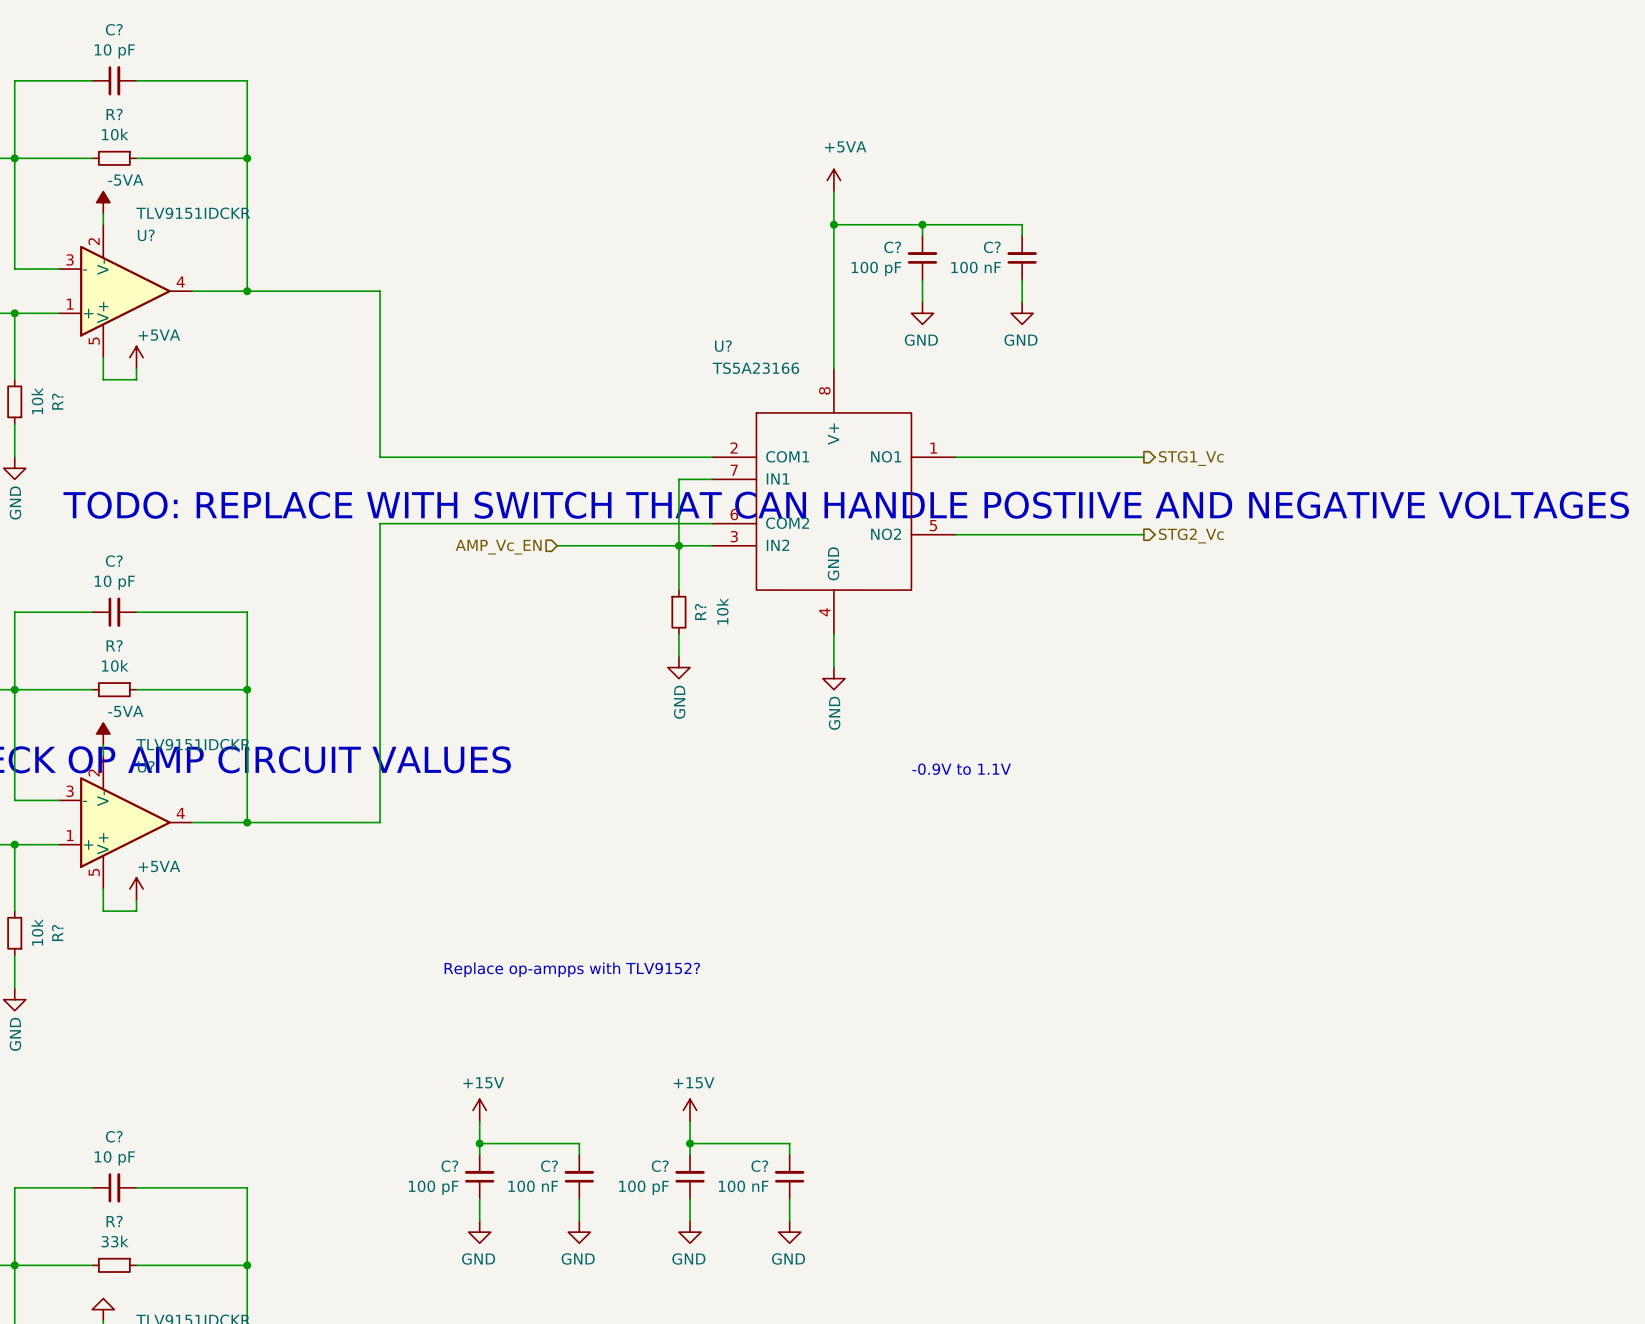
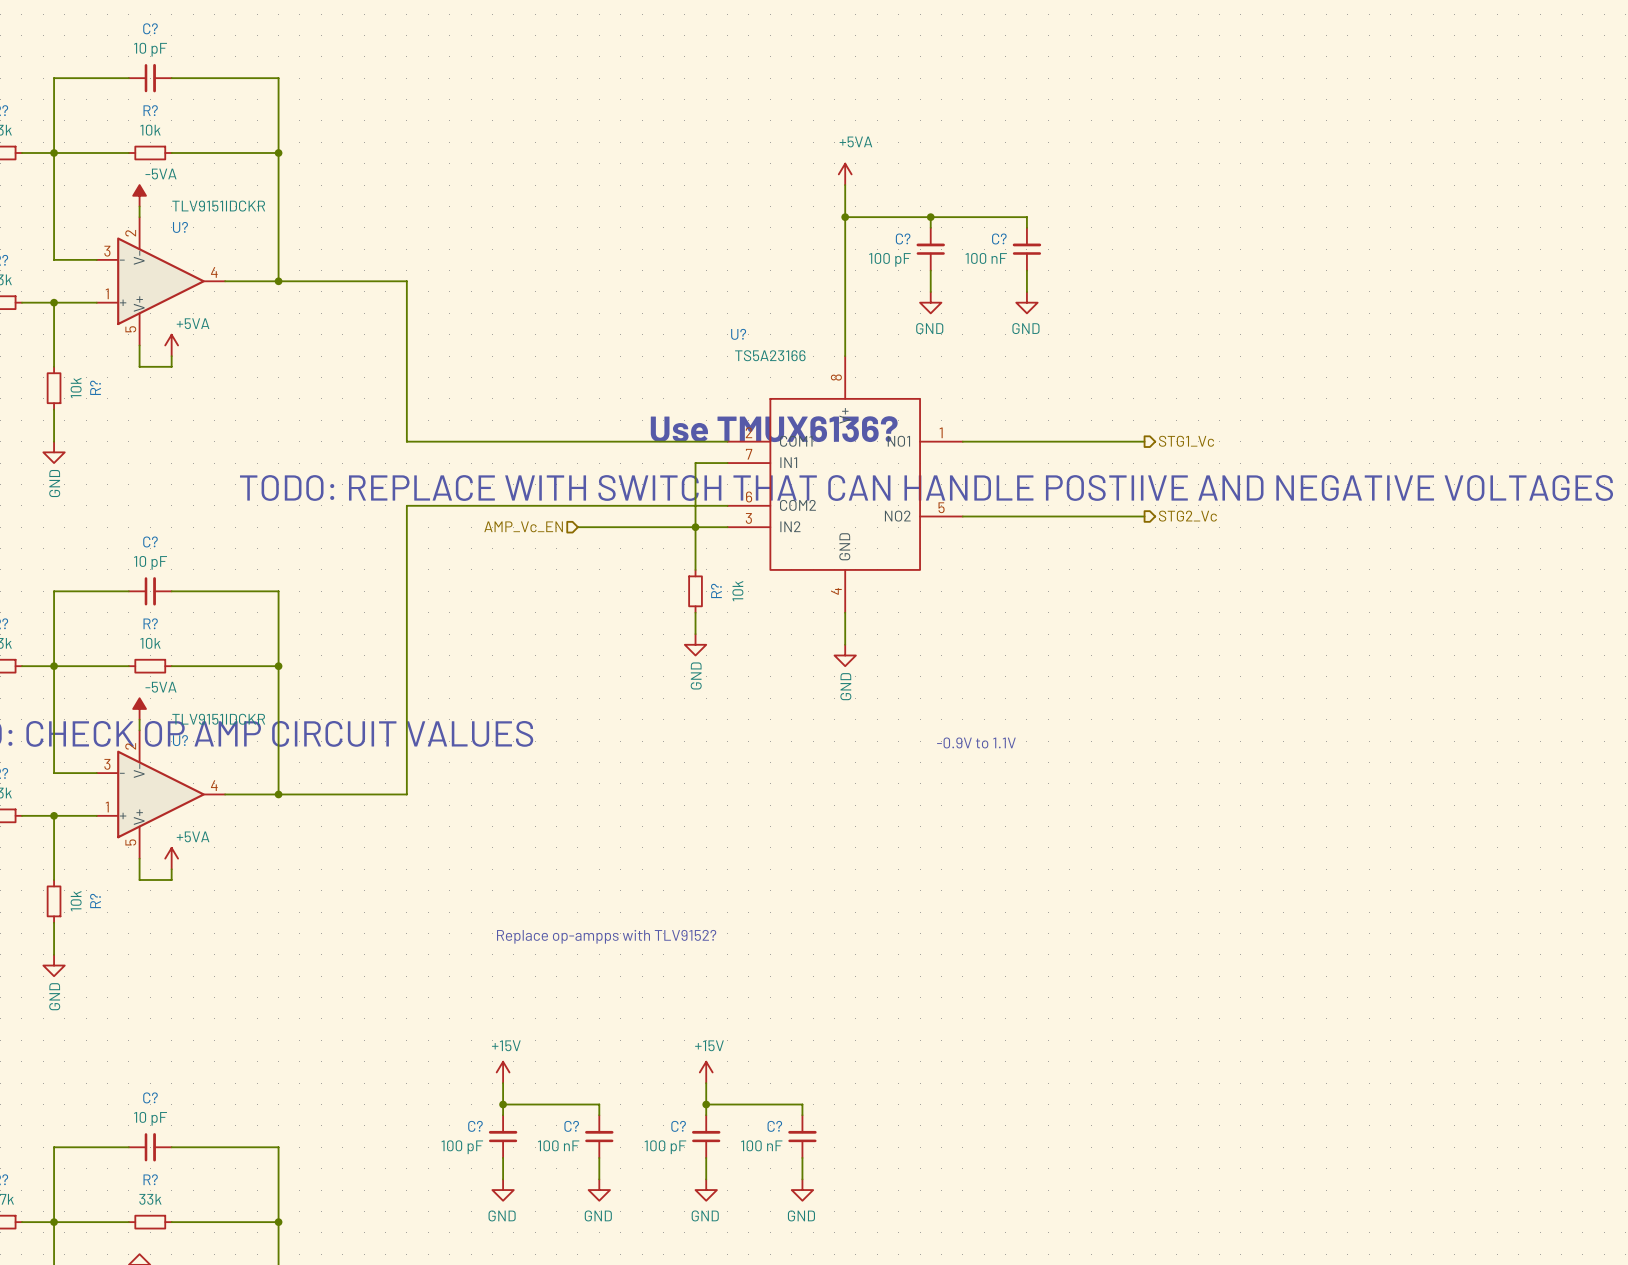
text: none -> Use TMUX6136? (774, 429)

